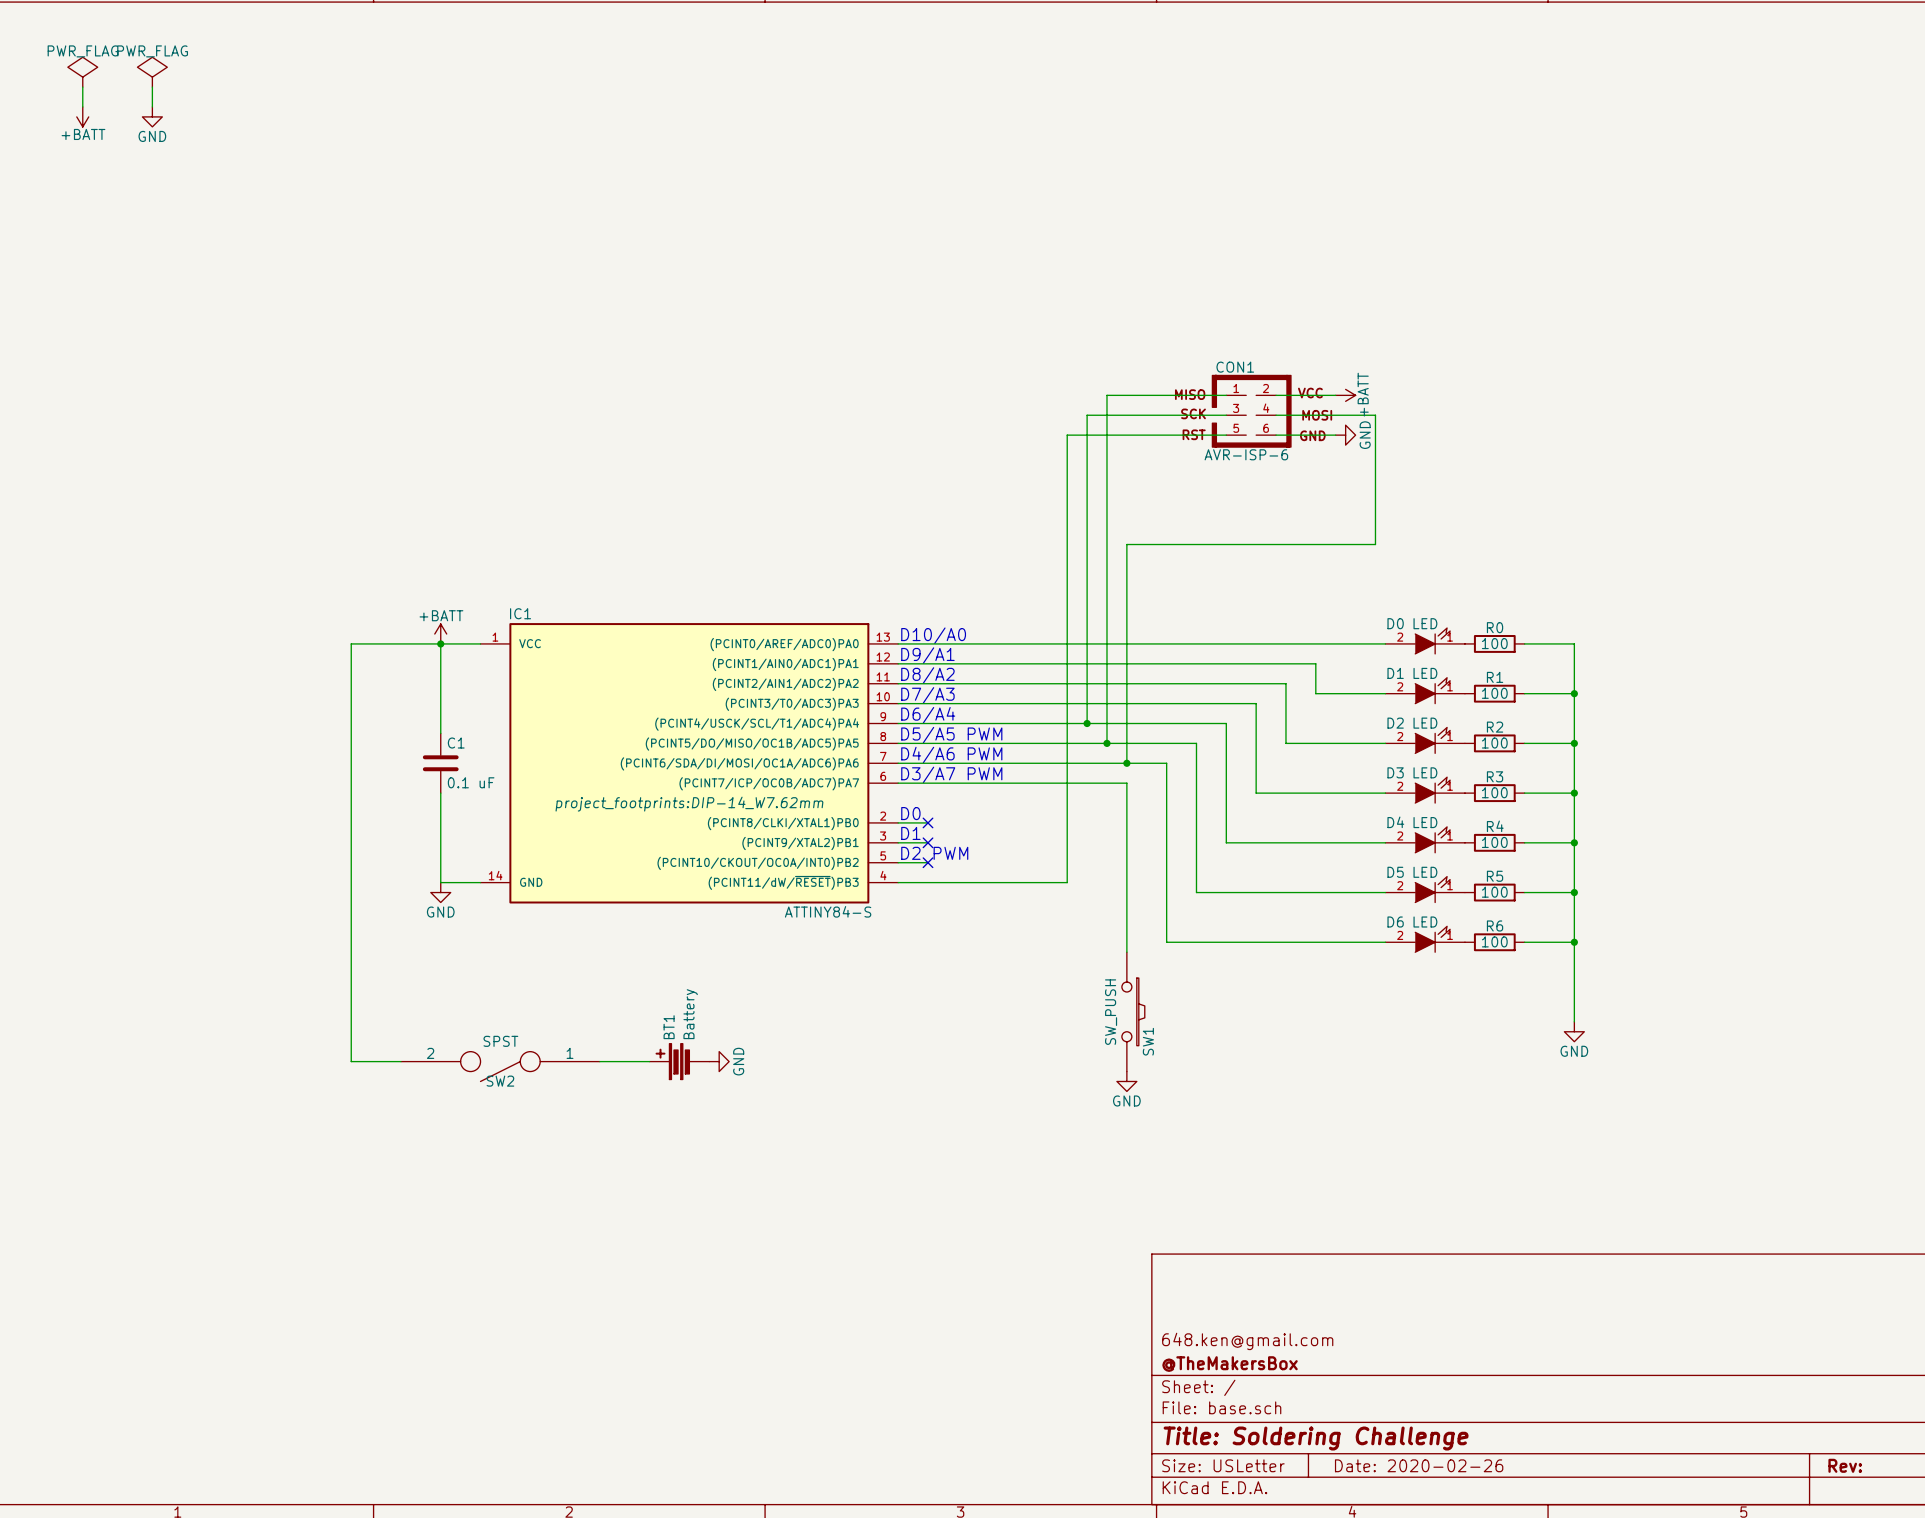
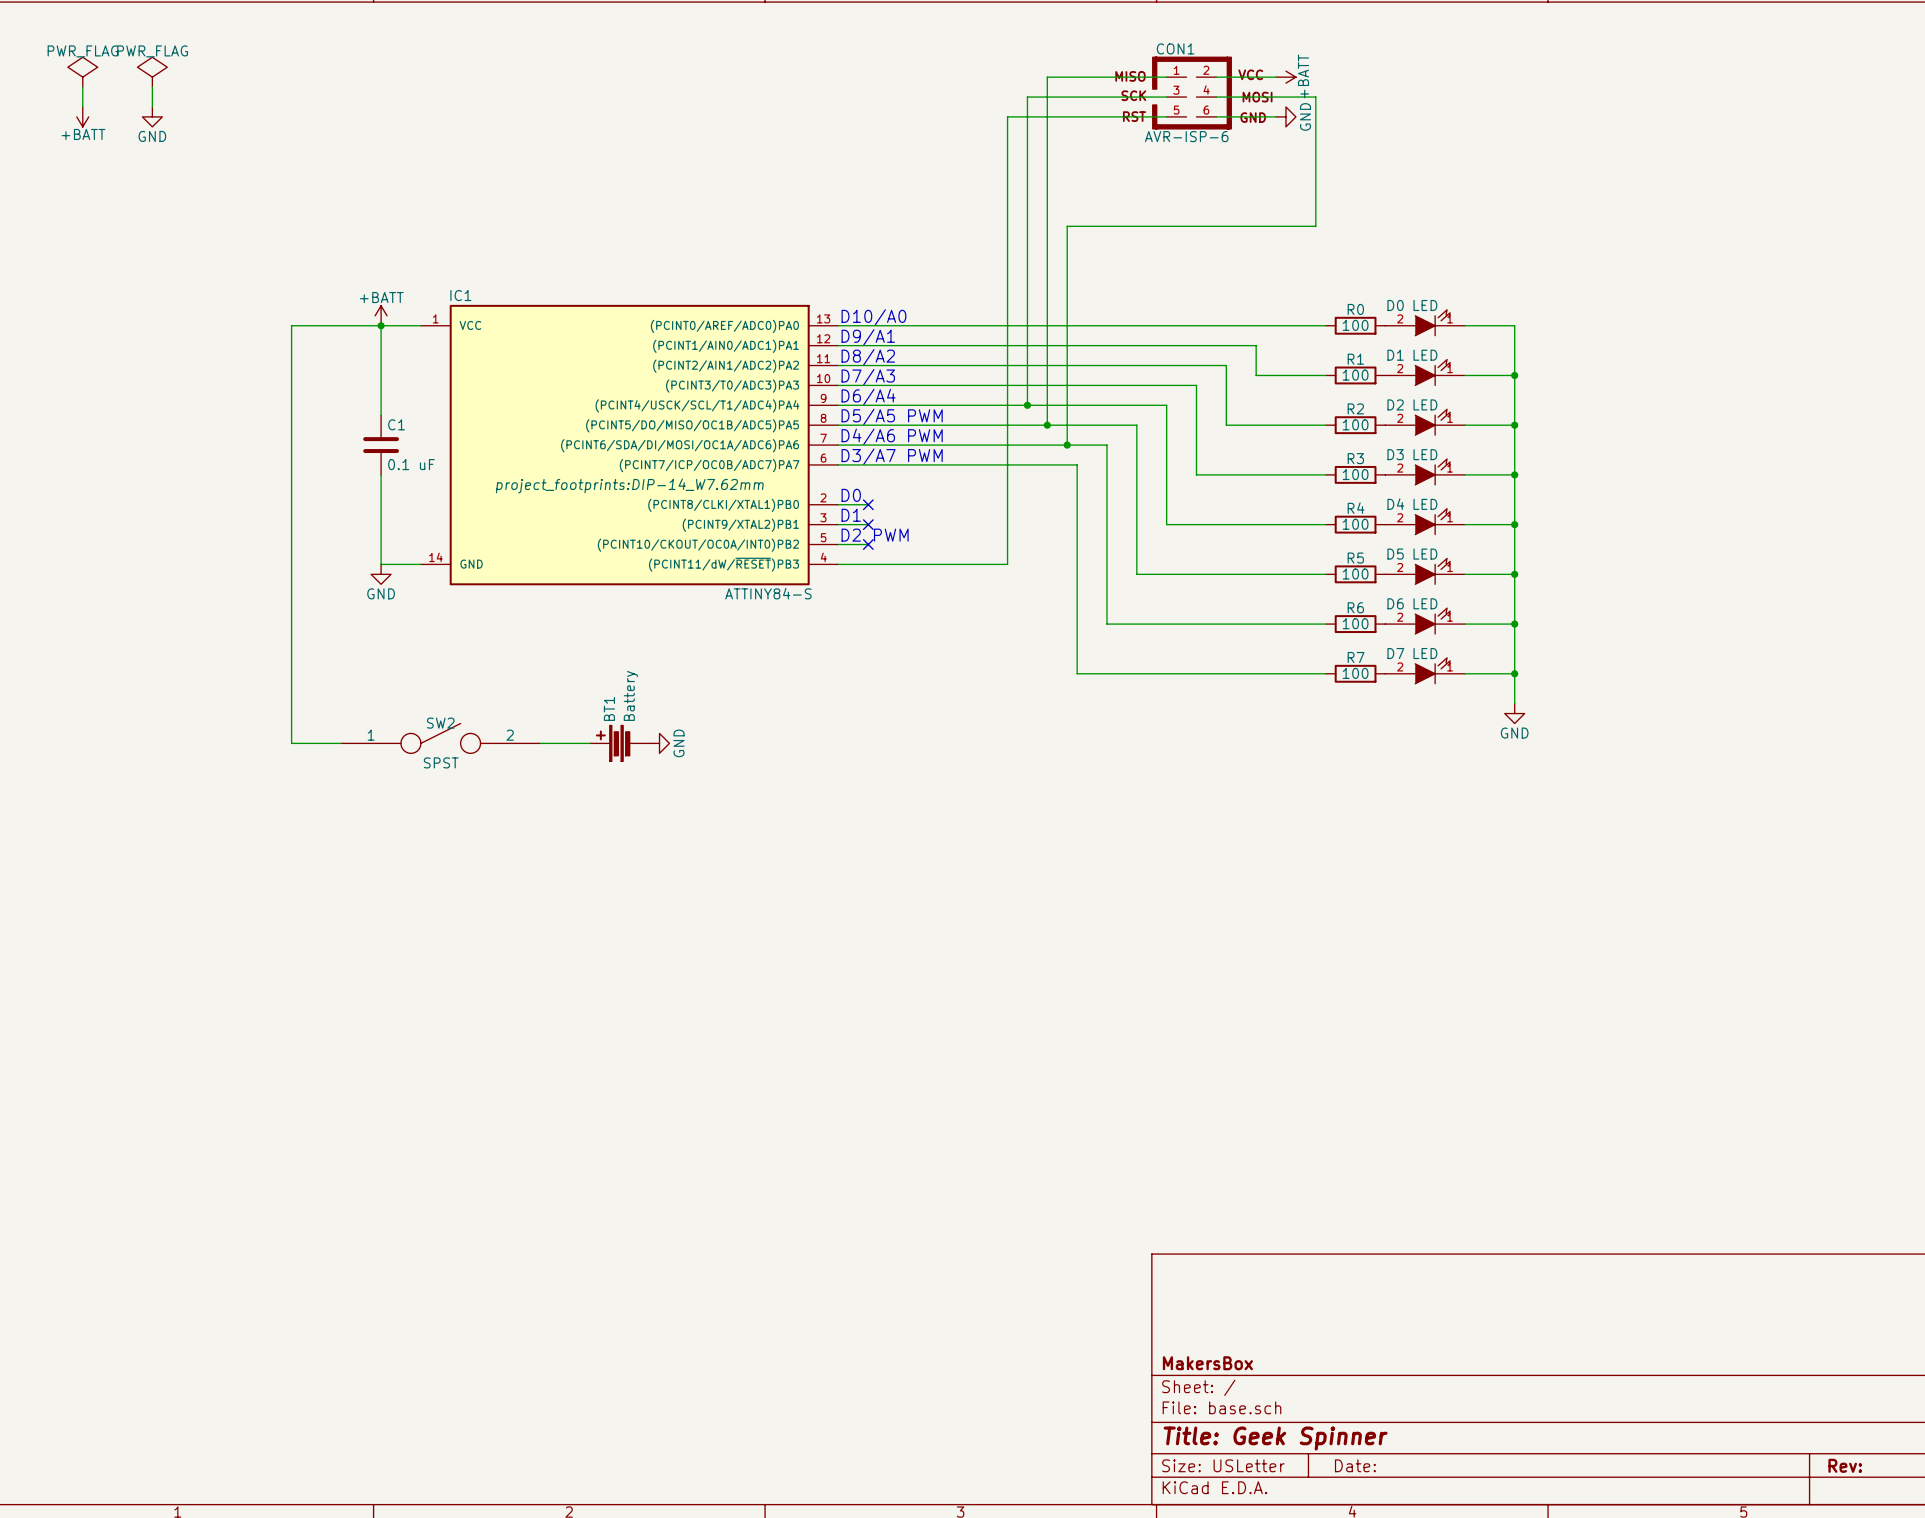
wire: none -> (1166, 77) (1047, 77) (1047, 425)
wire: none -> (1216, 77) (1276, 77)
power symbol: none -> +BATT (1285, 77)
wire: none -> (1166, 97) (1027, 97) (1027, 405)
wire: none -> (1166, 116) (1007, 116) (1007, 564) (838, 564)
wire: none -> (1216, 116) (1276, 116)
power symbol: none -> GND (1285, 116)
power symbol: none -> +BATT (381, 315)
text: none -> D10/A0 (873, 317)
wire: none -> (381, 325) (381, 415)
junction: none -> (381, 325)
wire: none -> (420, 325) (291, 325) (291, 743) (341, 743)
wire: none -> (838, 325) (1325, 325)
wire: none -> (1464, 325) (1514, 325) (1514, 703)
text: none -> D9/A1 (868, 337)
wire: none -> (838, 345) (1256, 345) (1256, 375) (1325, 375)
text: none -> D8/A2 (868, 357)
wire: none -> (838, 365) (1226, 365) (1226, 425) (1325, 425)
wire: none -> (1464, 375) (1514, 375)
junction: none -> (1514, 375)
text: none -> D7/A3 (868, 377)
wire: none -> (838, 385) (1196, 385) (1196, 474) (1325, 474)
wire: (1226, 395) (1106, 395) (1106, 445) -> (838, 445) (1106, 445)
wire: (1276, 395) (1335, 395) -> none
power symbol: +BATT (1345, 395) -> none
text: none -> D6/A4 (868, 397)
wire: none -> (838, 405) (1166, 405) (1166, 524) (1325, 524)
junction: none -> (1027, 405)
CON1 position: (1251, 411) -> (1192, 93)
wire: (1226, 415) (1087, 415) (1087, 723) -> none
wire: (1276, 415) (1375, 415) (1375, 544) (1126, 544) (1126, 763) -> none
text: none -> D5/A5 PWM (892, 416)
wire: none -> (838, 425) (1136, 425) (1136, 574) (1325, 574)
junction: none -> (1047, 425)
wire: none -> (1464, 425) (1514, 425)
junction: none -> (1514, 425)
wire: (1067, 435) (1226, 435) -> (1067, 435) (1067, 226) (1315, 226) (1315, 97) (1216, 97)
wire: (1276, 435) (1335, 435) -> none
power symbol: GND (1345, 435) -> none
text: none -> D4/A6 PWM (892, 436)
wire: (1067, 445) (1067, 882) (898, 882) -> none
junction: none -> (1067, 445)
text: none -> D3/A7 PWM (892, 456)
wire: none -> (838, 464) (1077, 464) (1077, 673) (1325, 673)
wire: none -> (381, 474) (381, 564) (420, 564)
wire: none -> (1464, 474) (1514, 474)
junction: none -> (1514, 474)
text: none -> D0 (851, 495)
wire: none -> (838, 504) (868, 504)
no-connect mark: none -> (868, 504)
text: none -> D1 (851, 515)
wire: none -> (838, 524) (868, 524)
no-connect mark: none -> (868, 524)
junction: none -> (1514, 524)
text: none -> D2 PWM (875, 535)
wire: none -> (838, 544) (868, 544)
no-connect mark: none -> (868, 544)
power symbol: none -> GND (381, 574)
junction: none -> (1514, 574)
wire: (1106, 624) (1106, 743) -> (1106, 624) (1325, 624)
junction: none -> (1514, 624)
power symbol: +BATT (440, 634) -> none
text: D10/A0 (933, 635) -> none
D0 position: (1425, 640) -> (1425, 322)
wire: (440, 643) (440, 733) -> none
junction: (440, 643) -> none
wire: (480, 643) (351, 643) (351, 1061) (400, 1061) -> none
wire: (898, 643) (1385, 643) -> none
R0 position: (1494, 643) -> (1355, 325)
wire: (1524, 643) (1574, 643) (1574, 1021) -> none
text: D9/A1 (927, 655) -> none
wire: (898, 663) (1315, 663) (1315, 693) (1385, 693) -> none
D7: none -> LED (1425, 670)
R7: none -> 100 (1355, 673)
junction: none -> (1514, 673)
text: D8/A2 (927, 675) -> none
wire: (898, 683) (1285, 683) (1285, 743) (1385, 743) -> none
D1 position: (1425, 690) -> (1425, 372)
R1 position: (1494, 693) -> (1355, 375)
wire: (1524, 693) (1574, 693) -> (1464, 524) (1514, 524)
junction: (1574, 693) -> none
text: D7/A3 (927, 695) -> none
wire: (898, 703) (1256, 703) (1256, 793) (1385, 793) -> none
power symbol: none -> GND (1514, 713)
text: D6/A4 (928, 715) -> none
wire: (898, 723) (1226, 723) (1226, 842) (1385, 842) -> none
junction: (1087, 723) -> none
text: D5/A5 PWM (951, 735) -> none
D2 position: (1425, 740) -> (1425, 422)
power symbol: none -> GND (659, 743)
wire: (898, 743) (1196, 743) (1196, 892) (1385, 892) -> none
junction: (1106, 743) -> none
R2 position: (1494, 743) -> (1355, 425)
wire: (1524, 743) (1574, 743) -> (1464, 574) (1514, 574)
junction: (1574, 743) -> none
text: D4/A6 PWM (951, 755) -> none
C1 position: (440, 763) -> (381, 445)
IC1 position: (689, 763) -> (629, 445)
wire: (898, 763) (1166, 763) (1166, 942) (1385, 942) -> none
junction: (1126, 763) -> none
text: D3/A7 PWM (951, 774) -> none
wire: (898, 783) (1126, 783) (1126, 952) -> none
D3 position: (1425, 790) -> (1425, 471)
wire: (440, 793) (440, 882) (480, 882) -> none
R3 position: (1494, 793) -> (1355, 474)
wire: (1524, 793) (1574, 793) -> (1464, 624) (1514, 624)
junction: (1574, 793) -> none
text: D0 (910, 813) -> none
wire: (898, 822) (928, 822) -> none
no-connect mark: (928, 822) -> none
text: D1 (910, 833) -> none
D4 position: (1425, 839) -> (1425, 521)
wire: (898, 842) (928, 842) -> none
no-connect mark: (928, 842) -> none
R4 position: (1494, 842) -> (1355, 524)
wire: (1524, 842) (1574, 842) -> (1464, 673) (1514, 673)
junction: (1574, 842) -> none
text: D2 PWM (934, 853) -> none
wire: (898, 862) (928, 862) -> none
no-connect mark: (928, 862) -> none
D5 position: (1425, 889) -> (1425, 571)
power symbol: GND (440, 892) -> none
R5 position: (1494, 892) -> (1355, 574)
wire: (1524, 892) (1574, 892) -> none
junction: (1574, 892) -> none
D6 position: (1425, 939) -> (1425, 621)
R6 position: (1494, 942) -> (1355, 624)
wire: (1524, 942) (1574, 942) -> none
junction: (1574, 942) -> none
SW1: SW_PUSH (1133, 1011) -> none
power symbol: GND (1574, 1031) -> none
wire: (599, 1061) (649, 1061) -> none
BT1 position: (679, 1061) -> (619, 743)
power symbol: GND (719, 1061) -> none
SW2 rotation: 0° (500, 1066) -> 180° (440, 738)
SW2 position: (500, 1066) -> (440, 738)
power symbol: GND (1126, 1081) -> none
title block: 648.ken@gmail.com (1247, 1341) -> none
title block: @TheMakersBox (1230, 1364) -> MakersBox (1207, 1363)
title block: Title: Soldering Challenge (1316, 1438) -> Title: Geek Spinner (1275, 1438)
title block: Date: 2020-02-26 (1419, 1465) -> Date: (1355, 1465)

